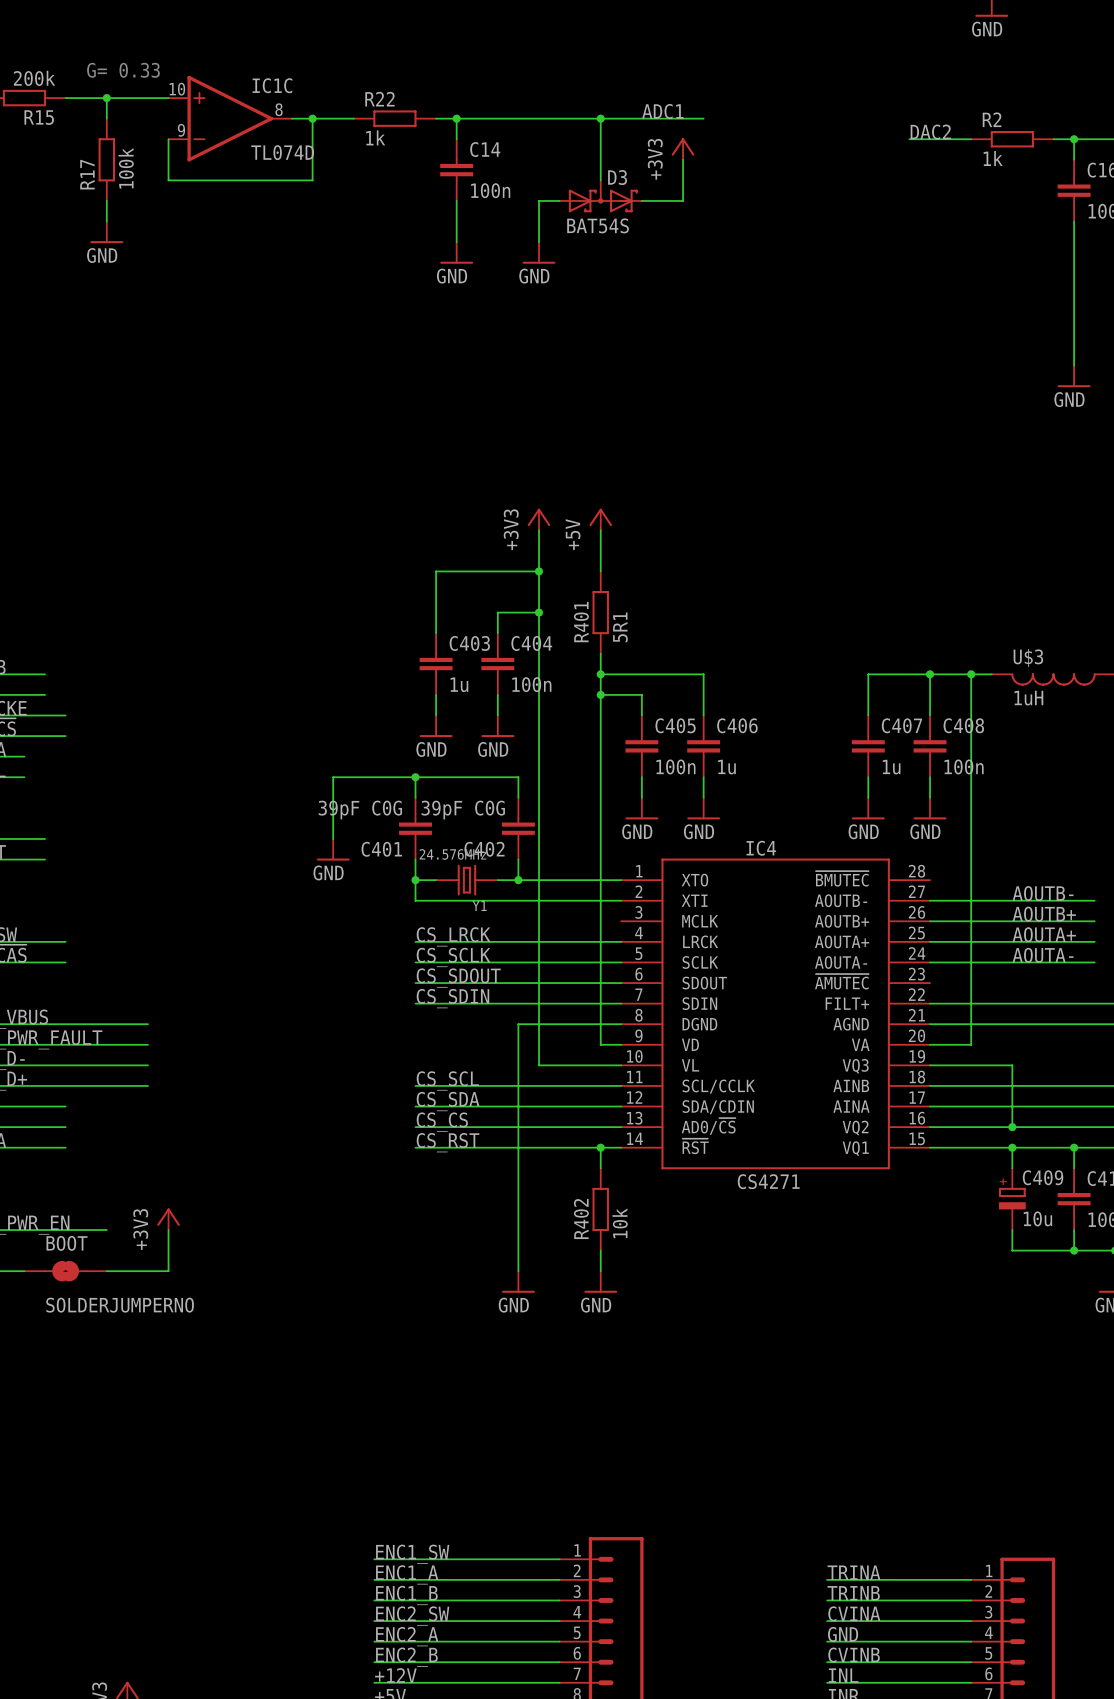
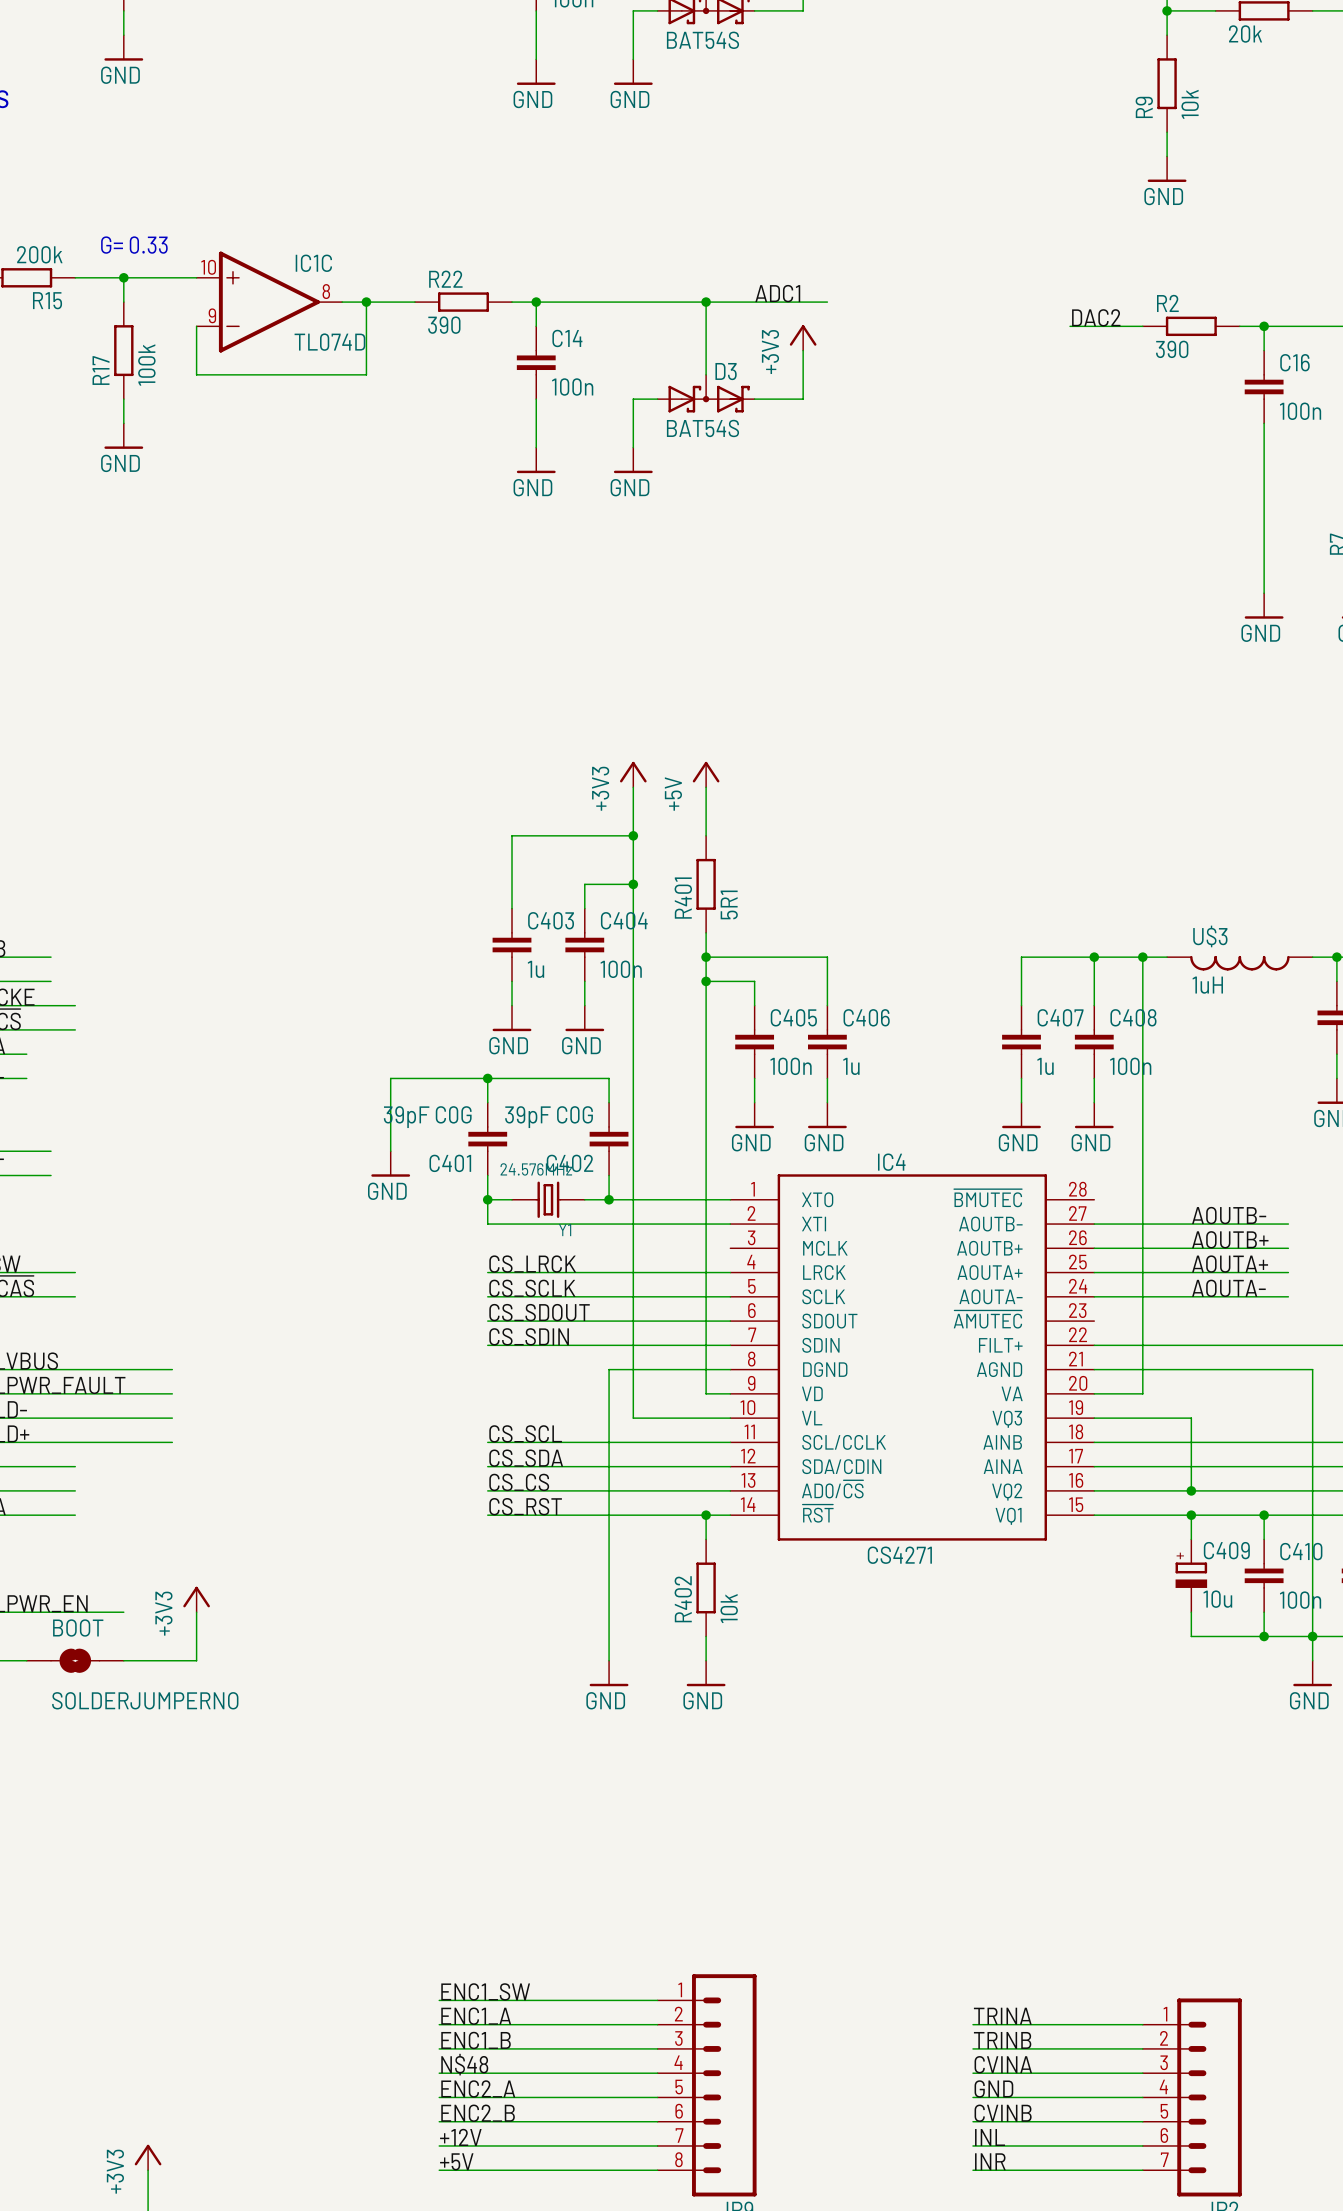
R22 value: 1k (375, 137) -> 390 (444, 325)
R2 value: 1k (993, 158) -> 390 (1172, 349)
label: ENC2_SW (412, 1616) -> N$48 (464, 2064)

